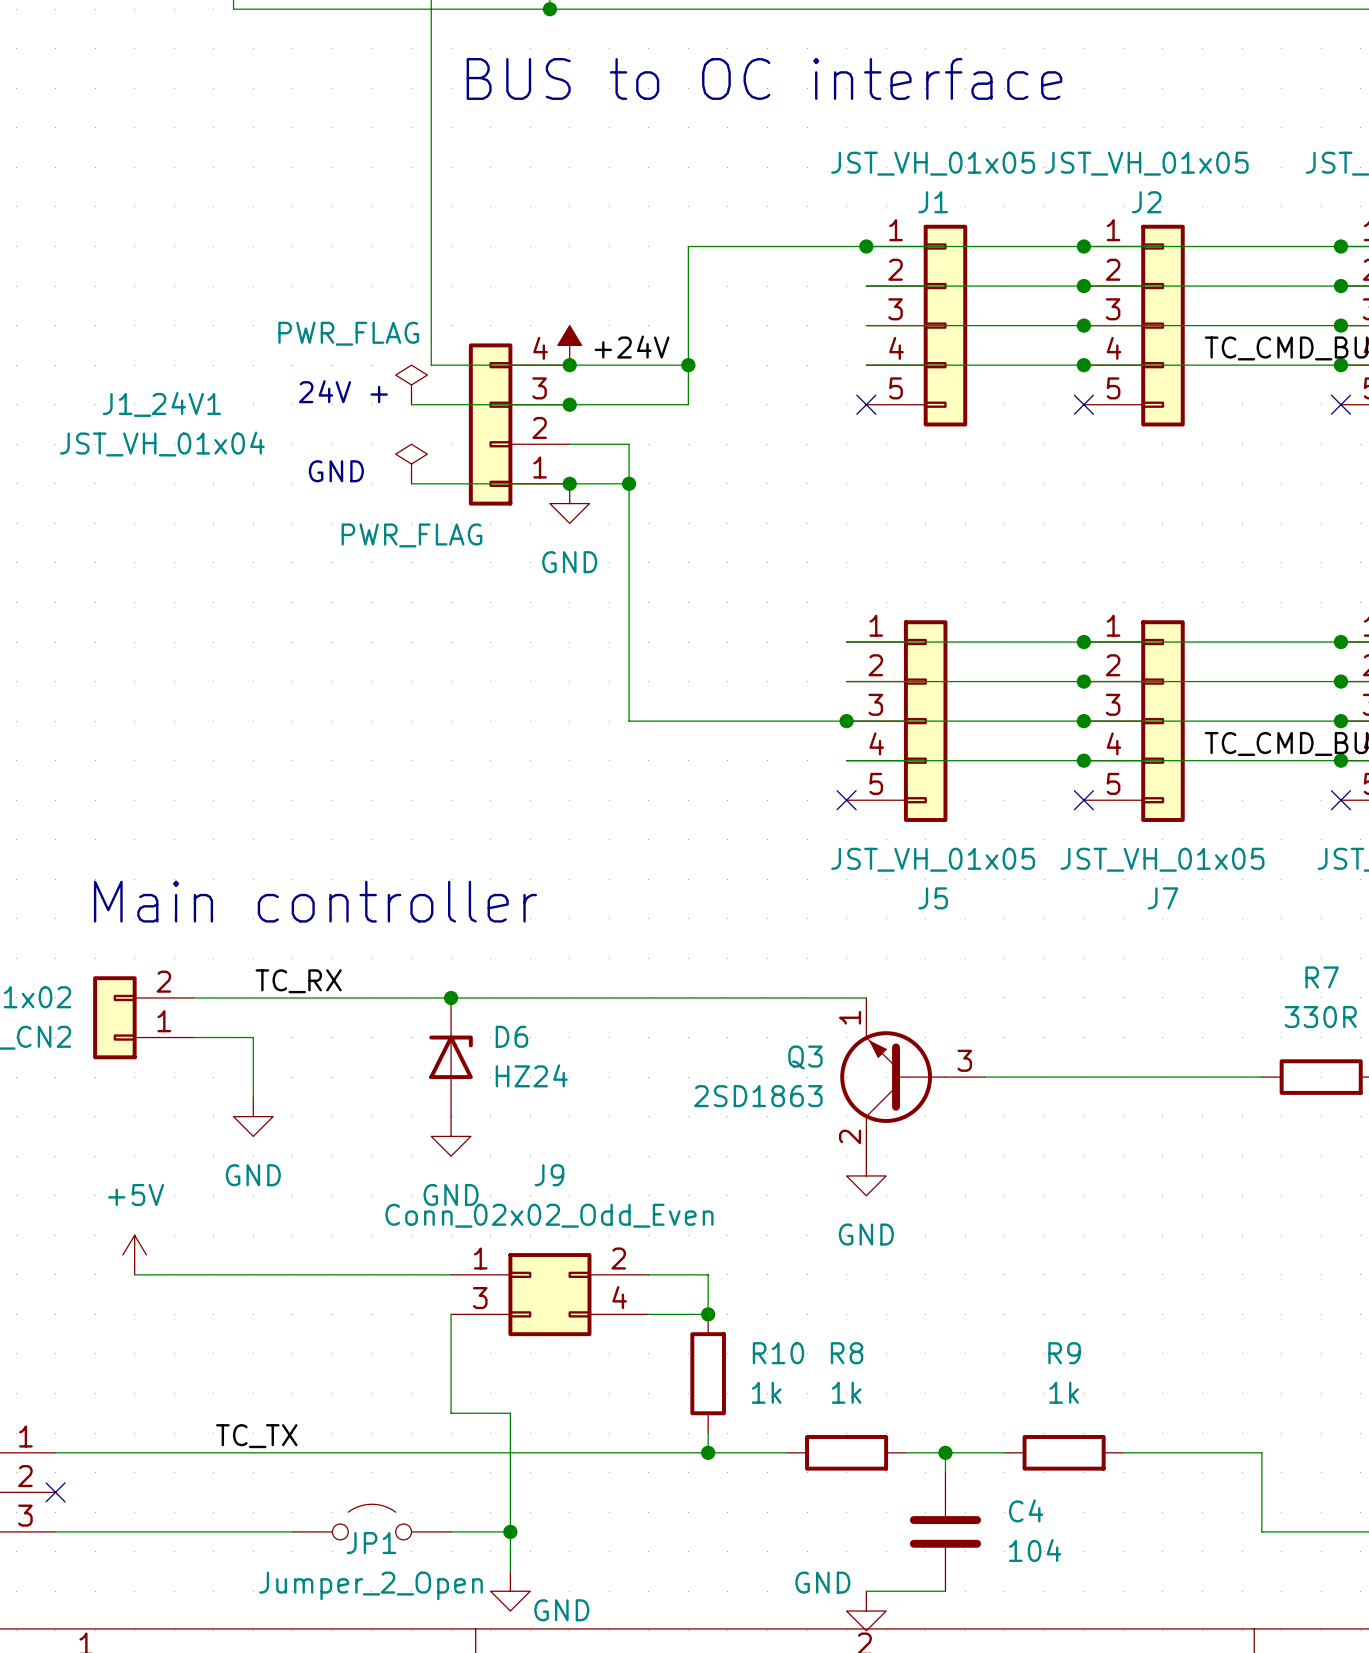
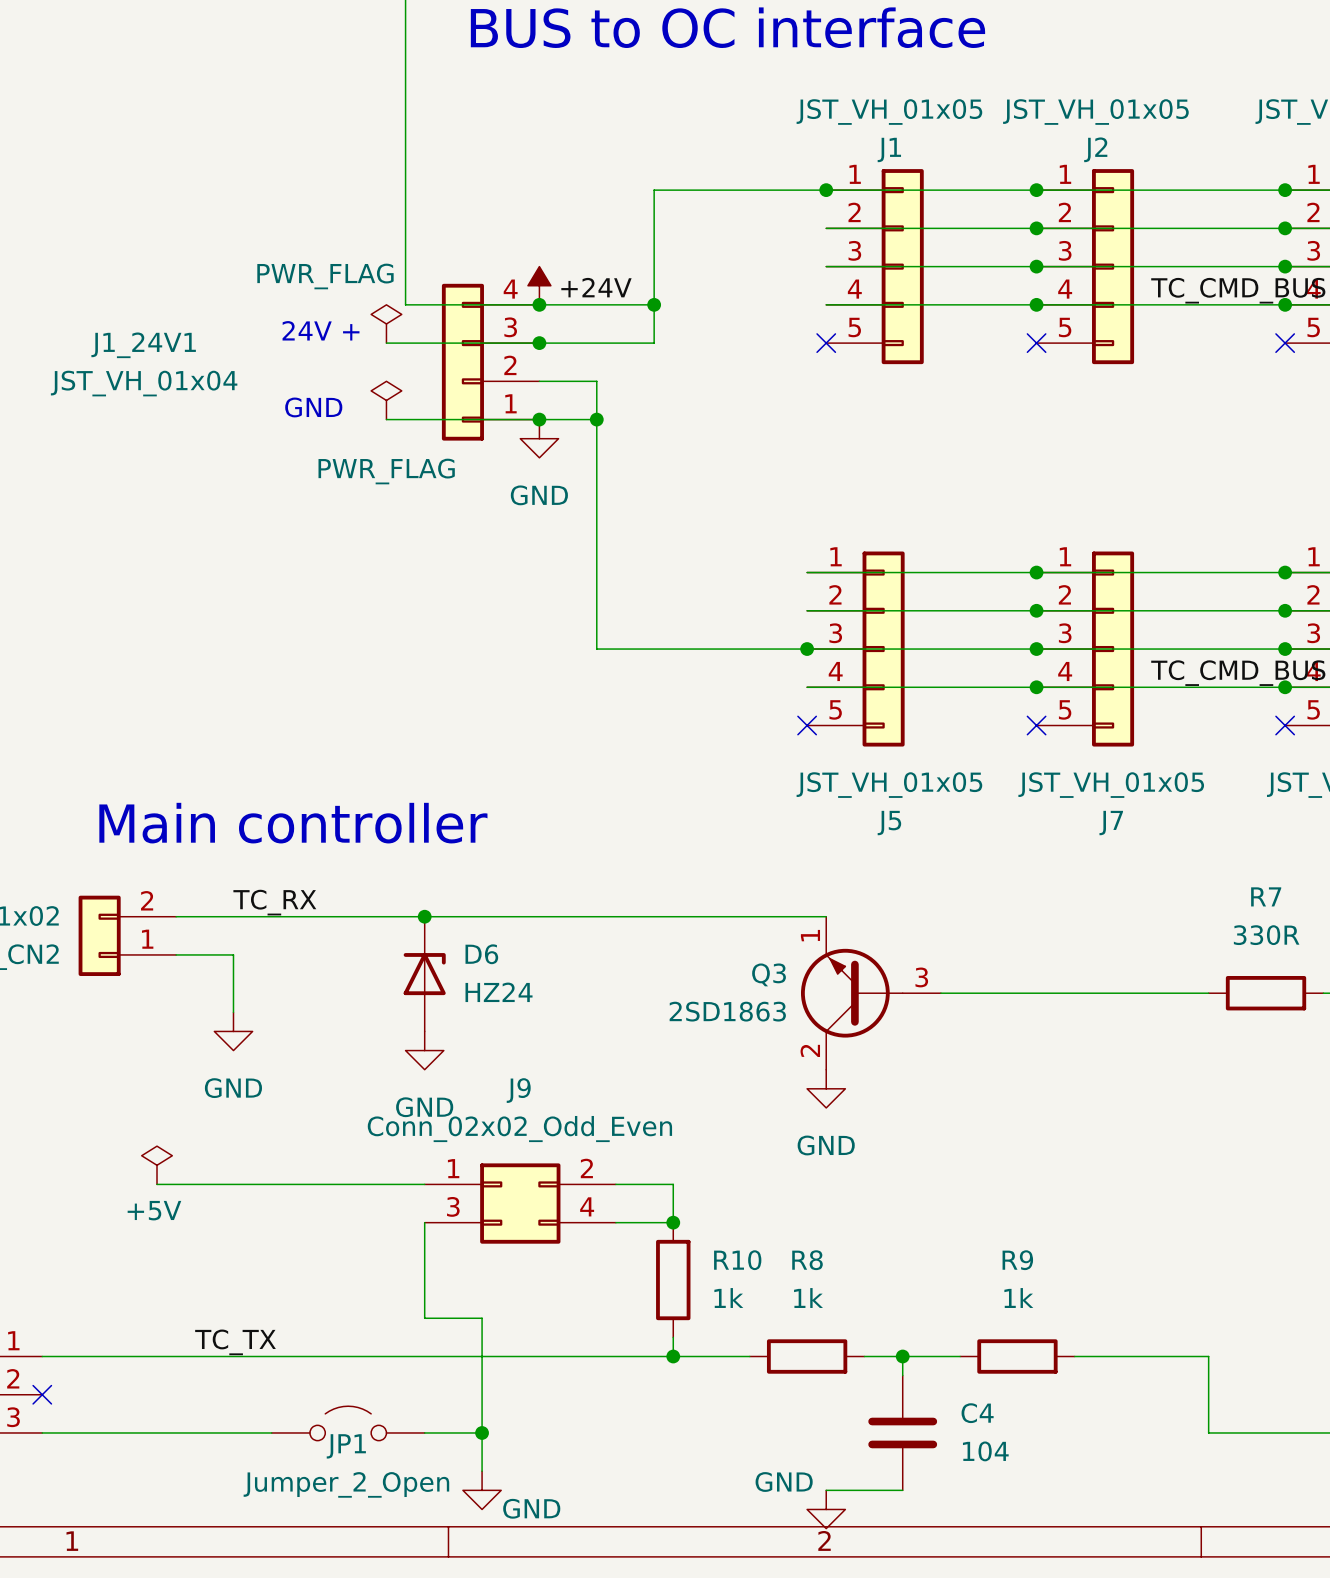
power symbol: +5V (134, 1255) -> none
power symbol: none -> +5V (157, 1165)
wire: (134, 1274) (174, 1274) -> none

